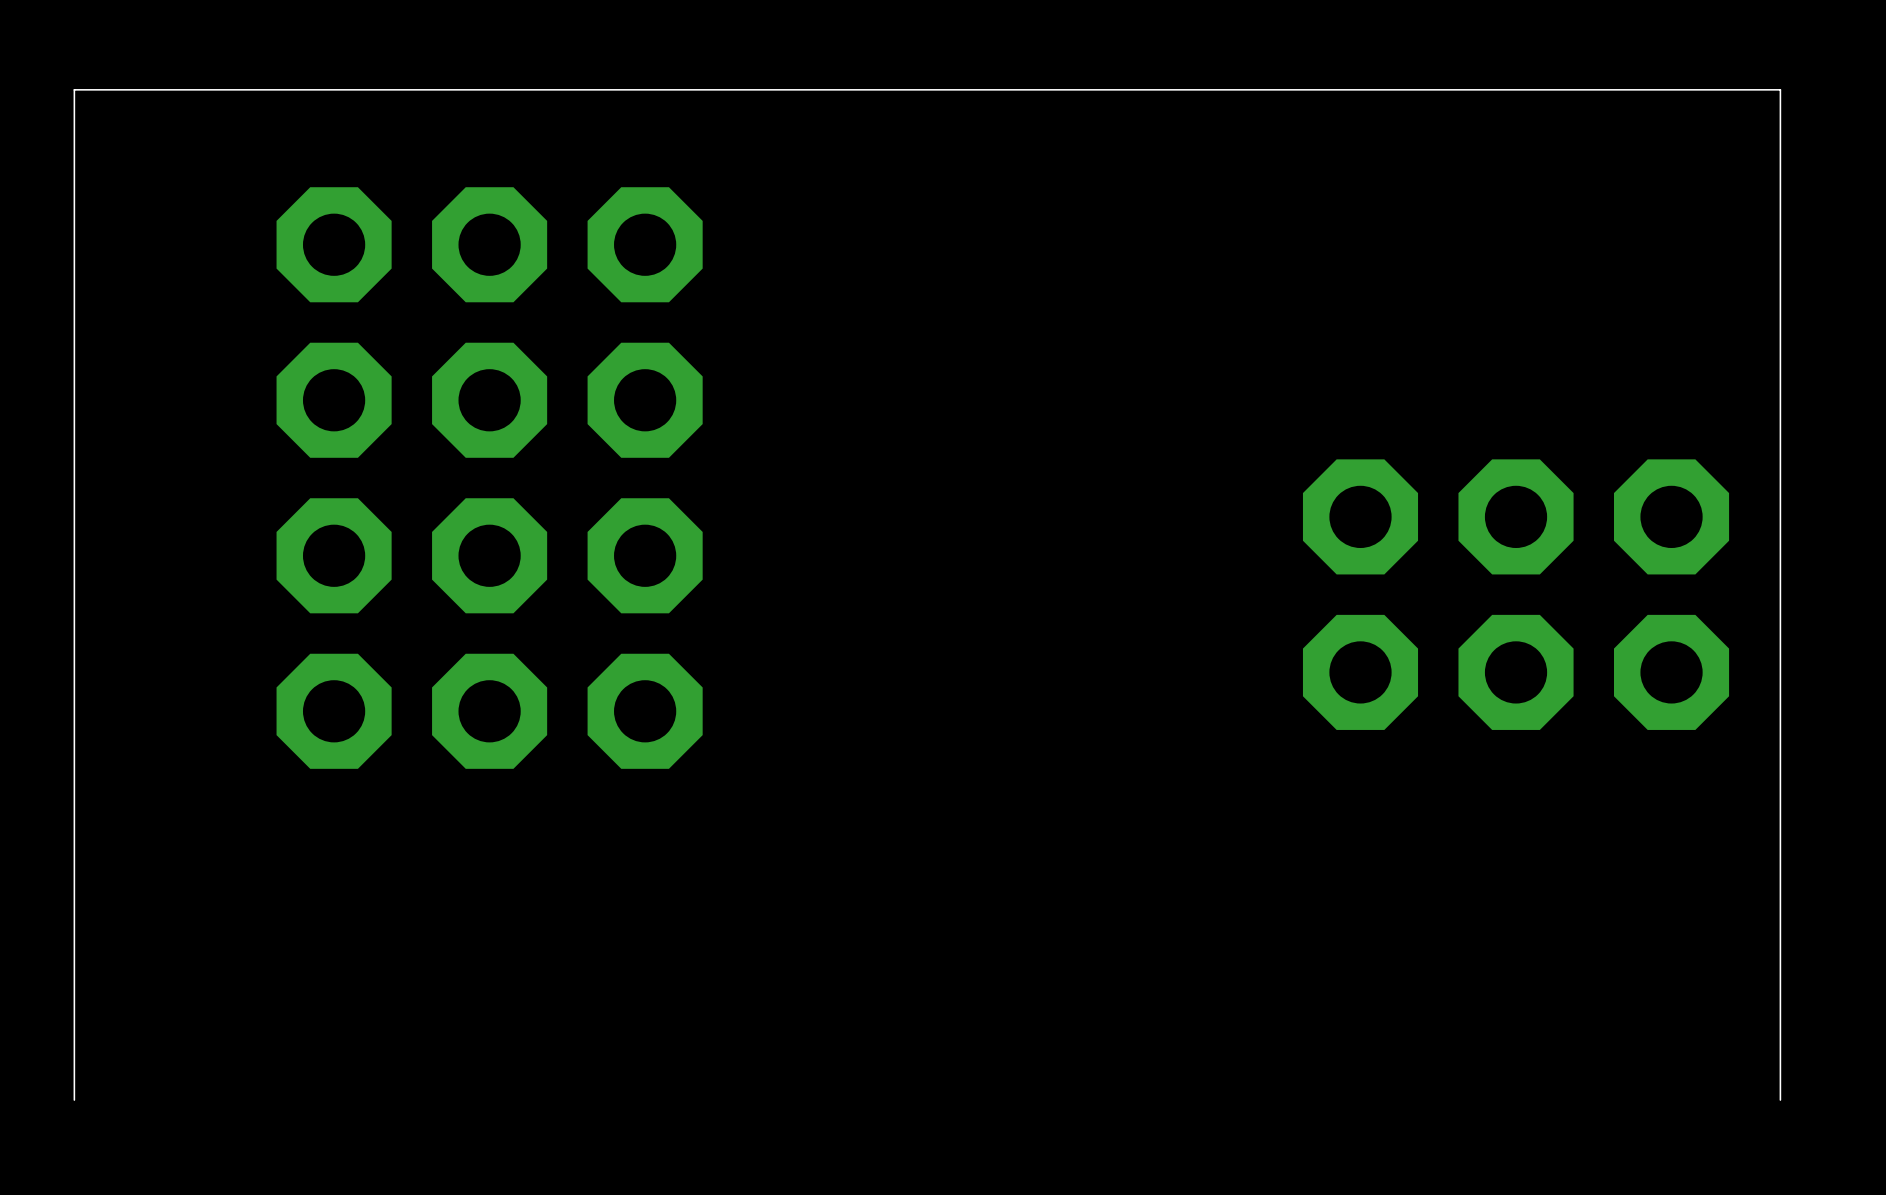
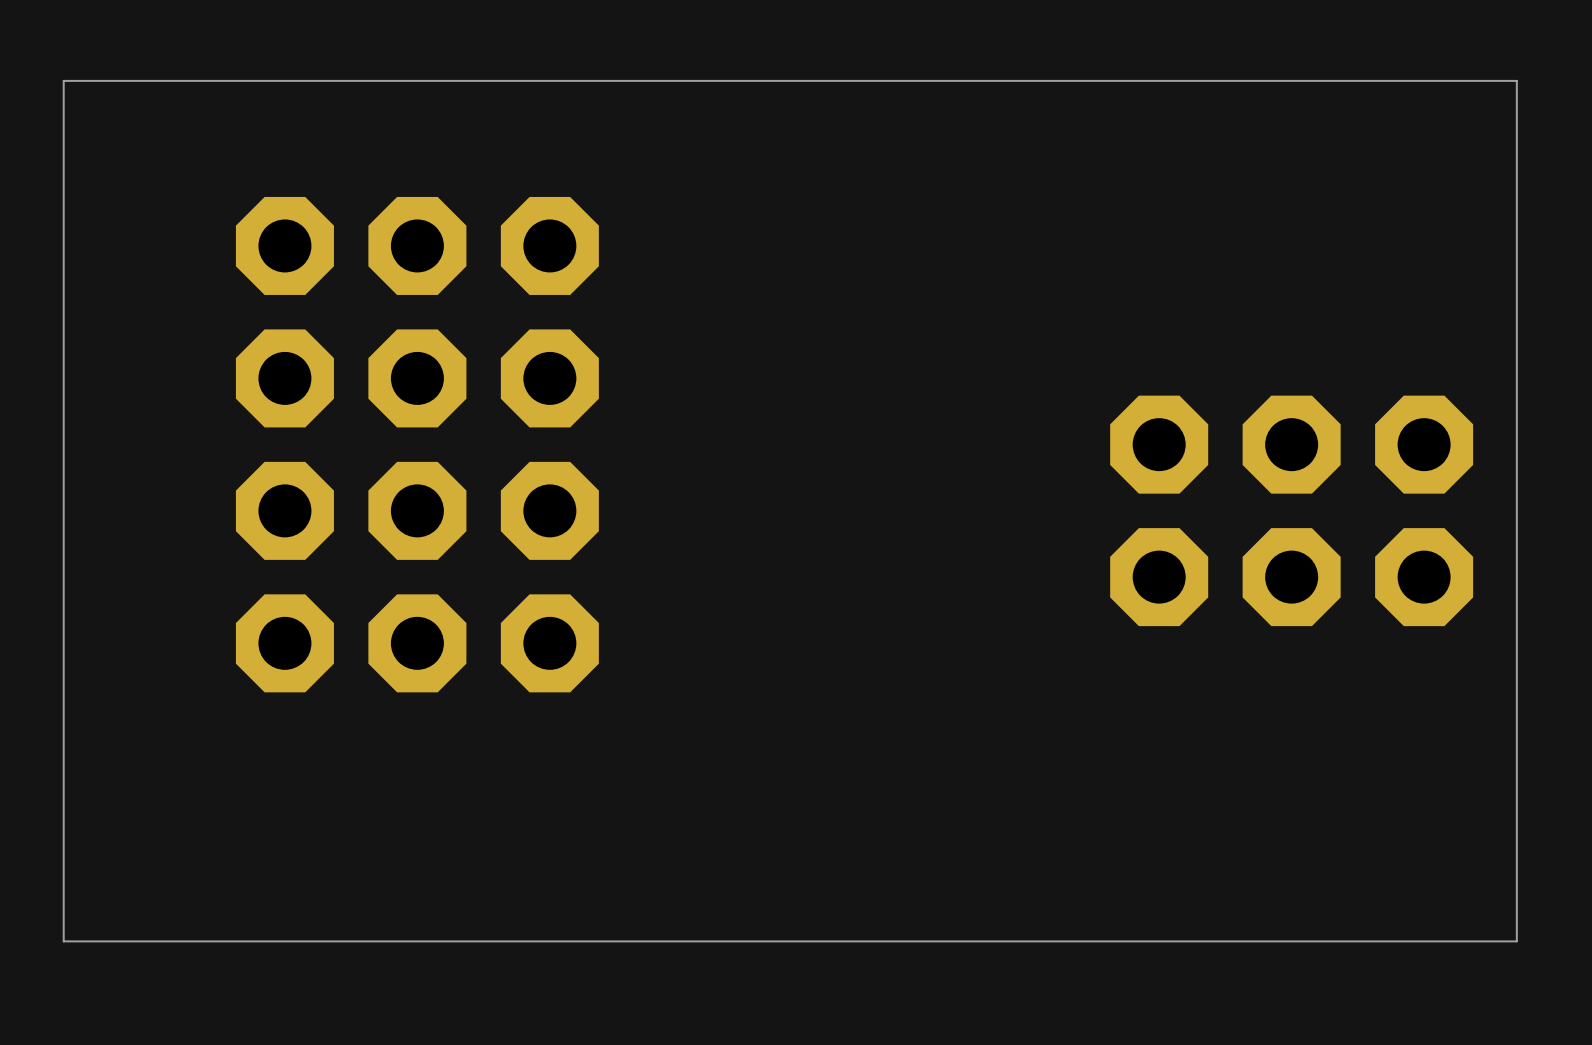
part position: (489, 322) -> (417, 312)
part position: (489, 633) -> (417, 577)
board edge: none -> (1516, 941) (63, 941)

